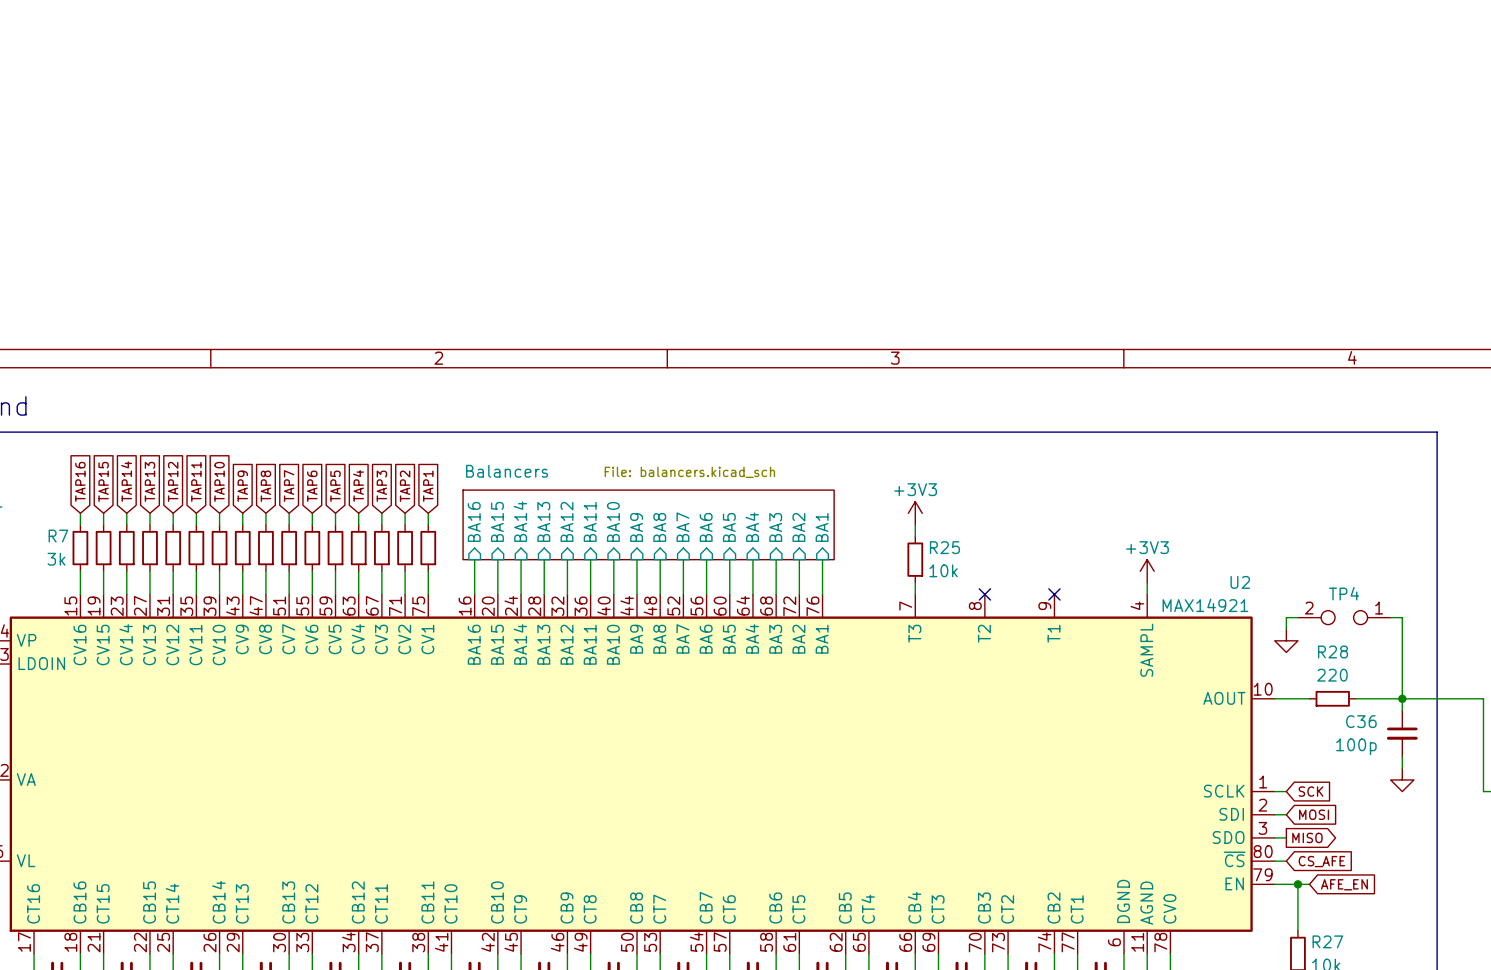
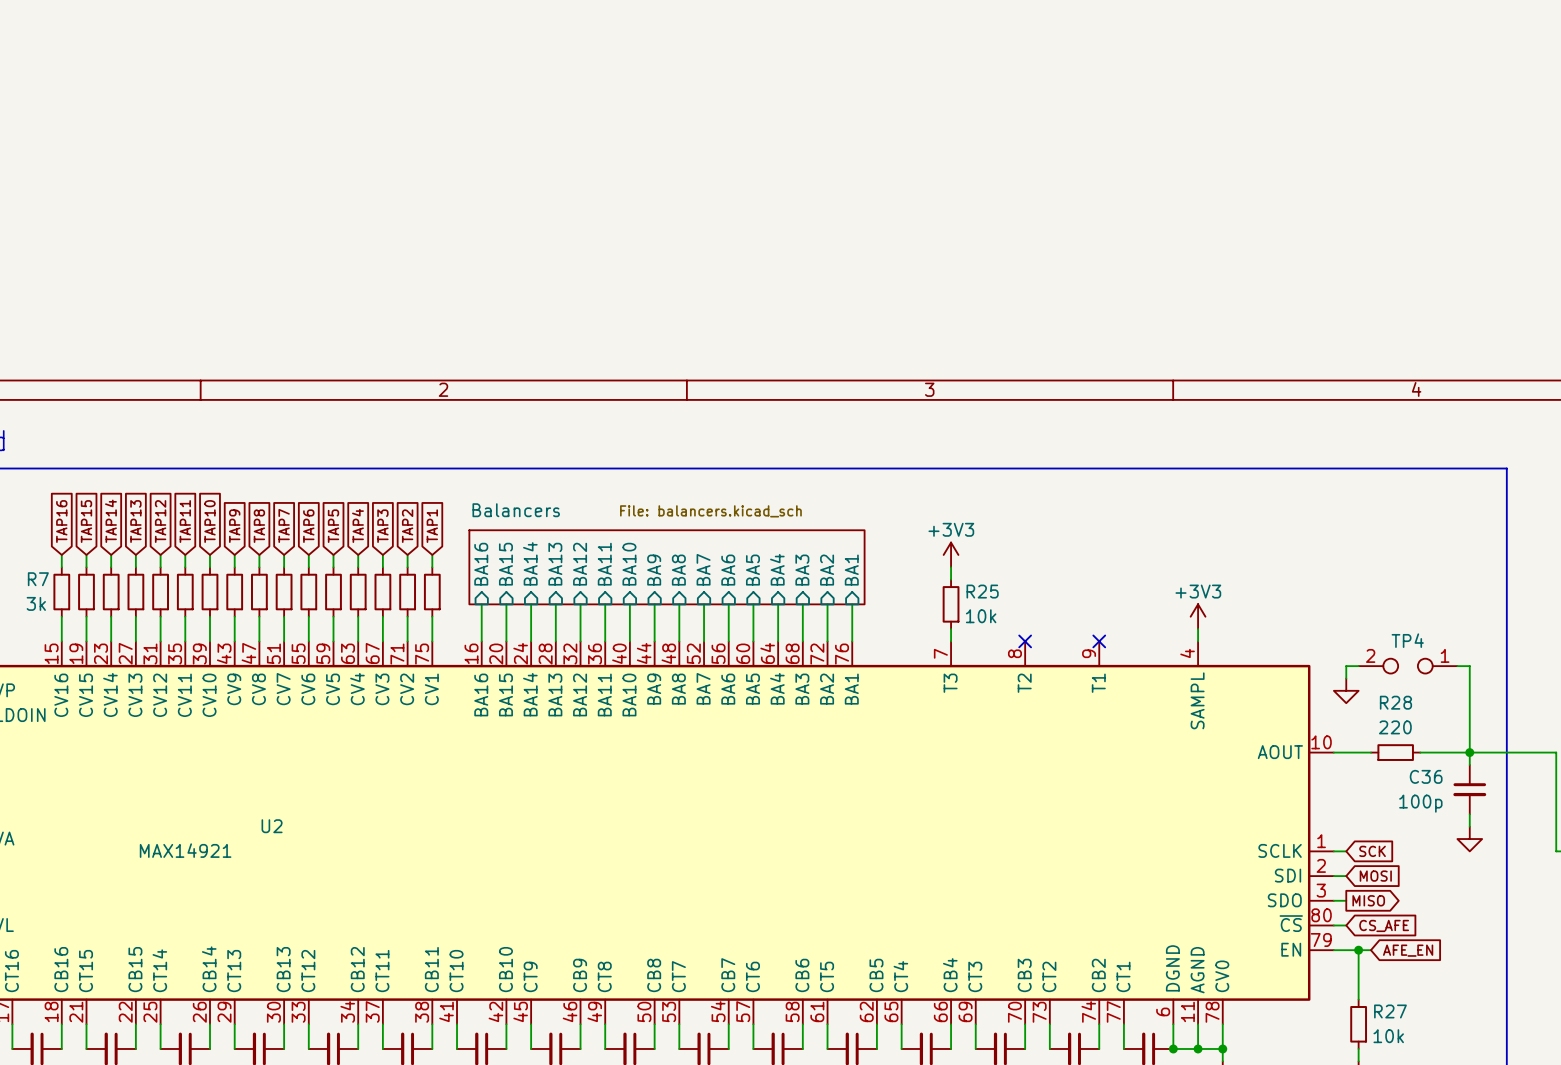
U2 name position: U2 (1240, 582) -> U2 (272, 826)
U2 value position: MAX14921 (1205, 605) -> MAX14921 (185, 850)

